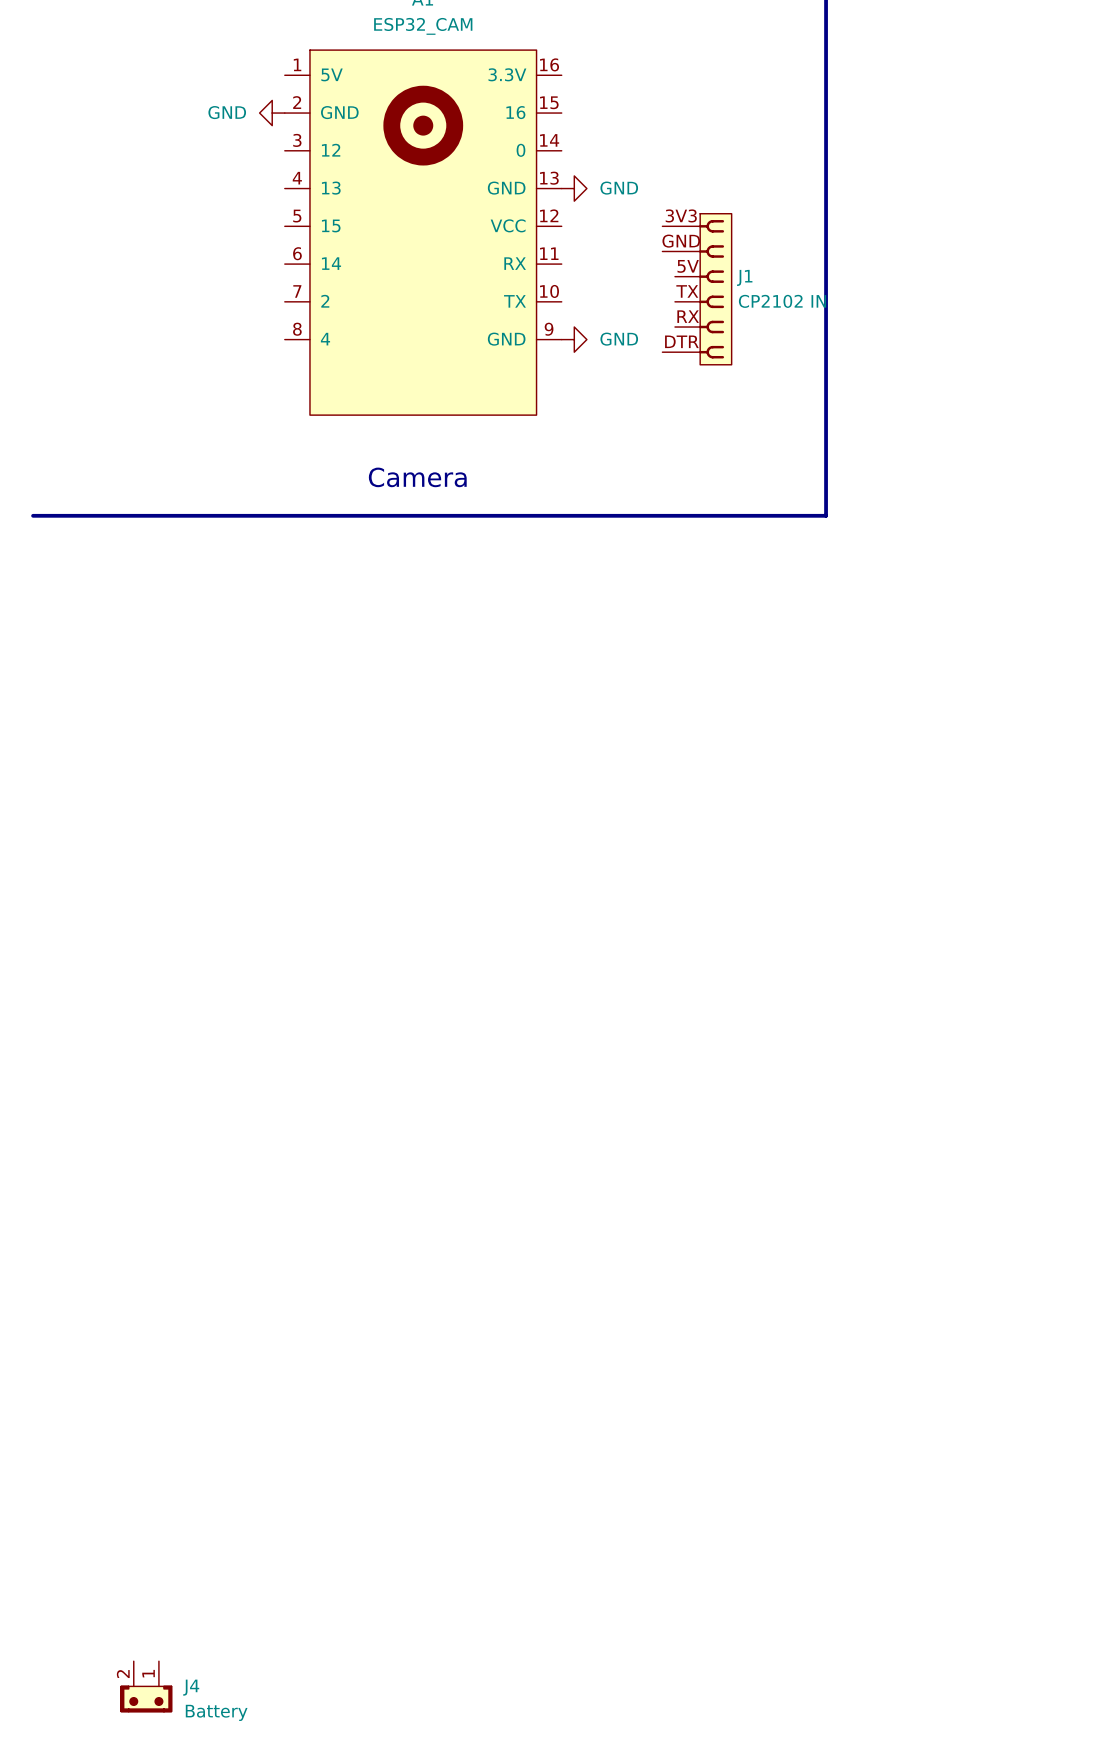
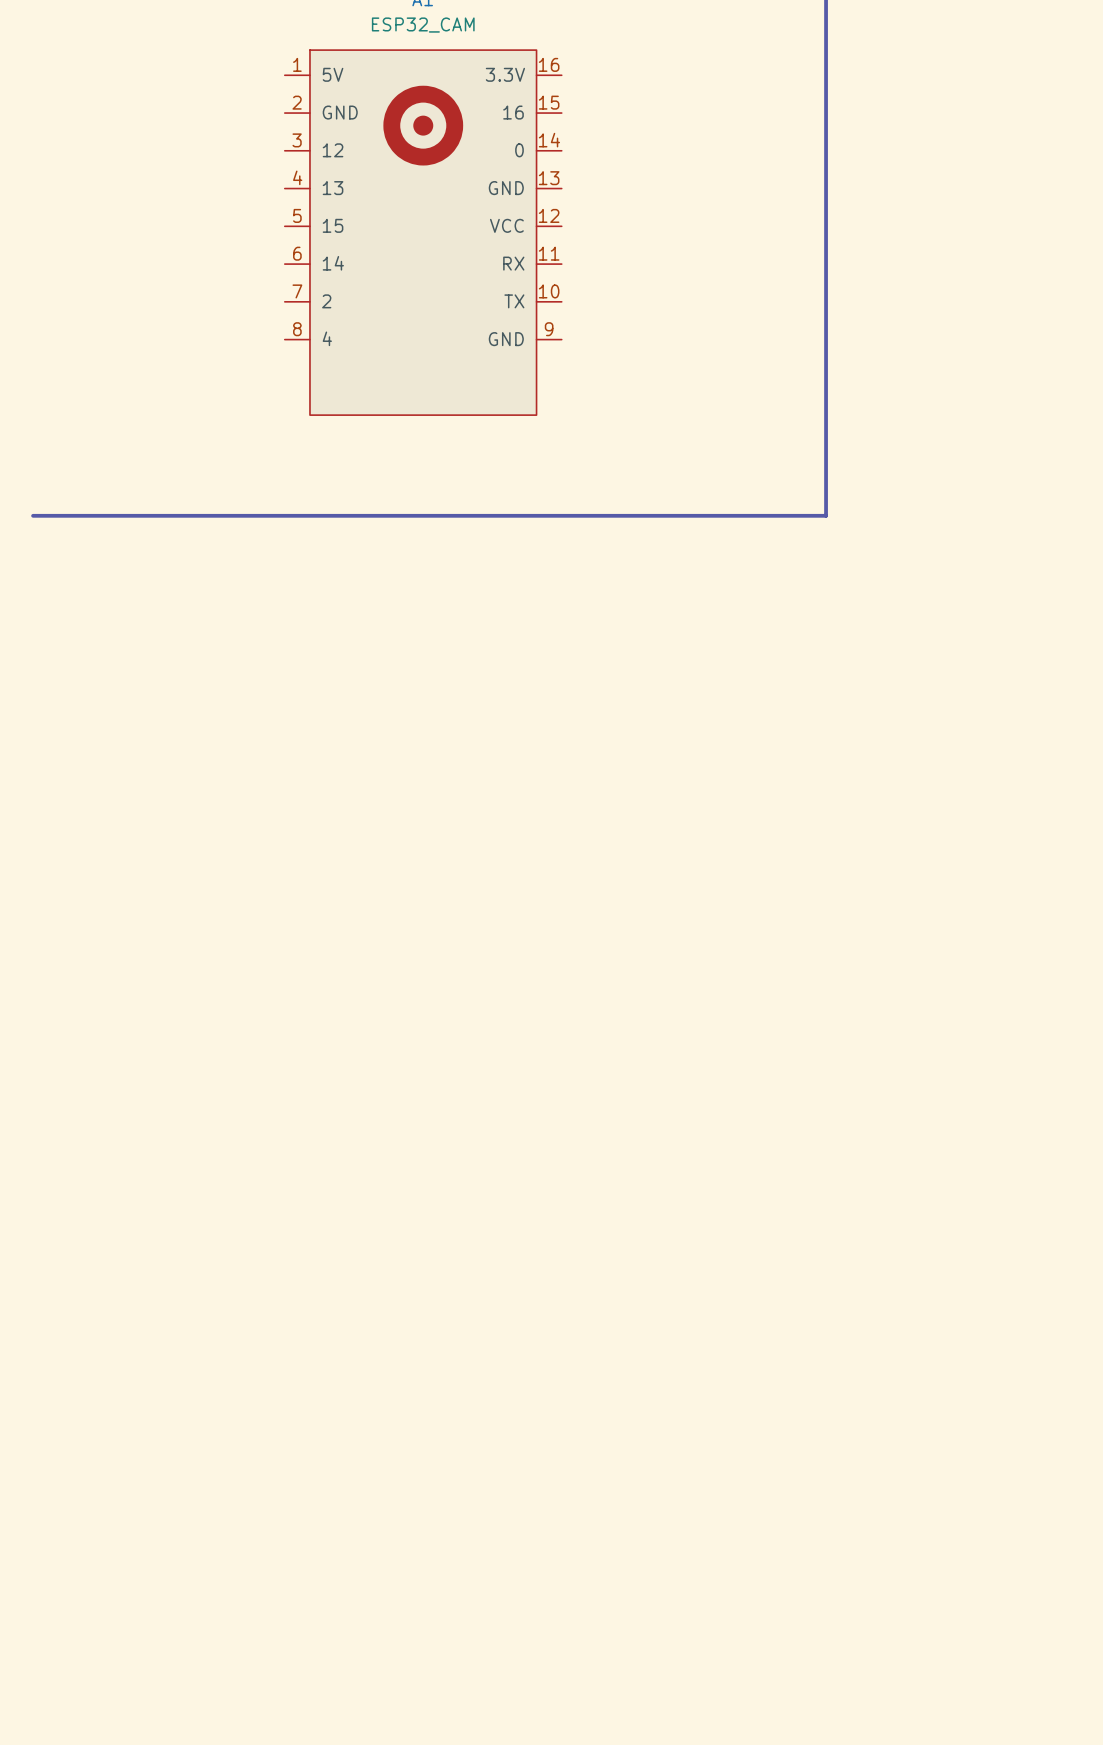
power symbol: GND (272, 113) -> none
power symbol: GND (574, 188) -> none
J1: CP2102 IN (697, 289) -> none
power symbol: GND (574, 339) -> none
text: Camera (417, 477) -> none
J4: Battery (146, 1686) -> none

